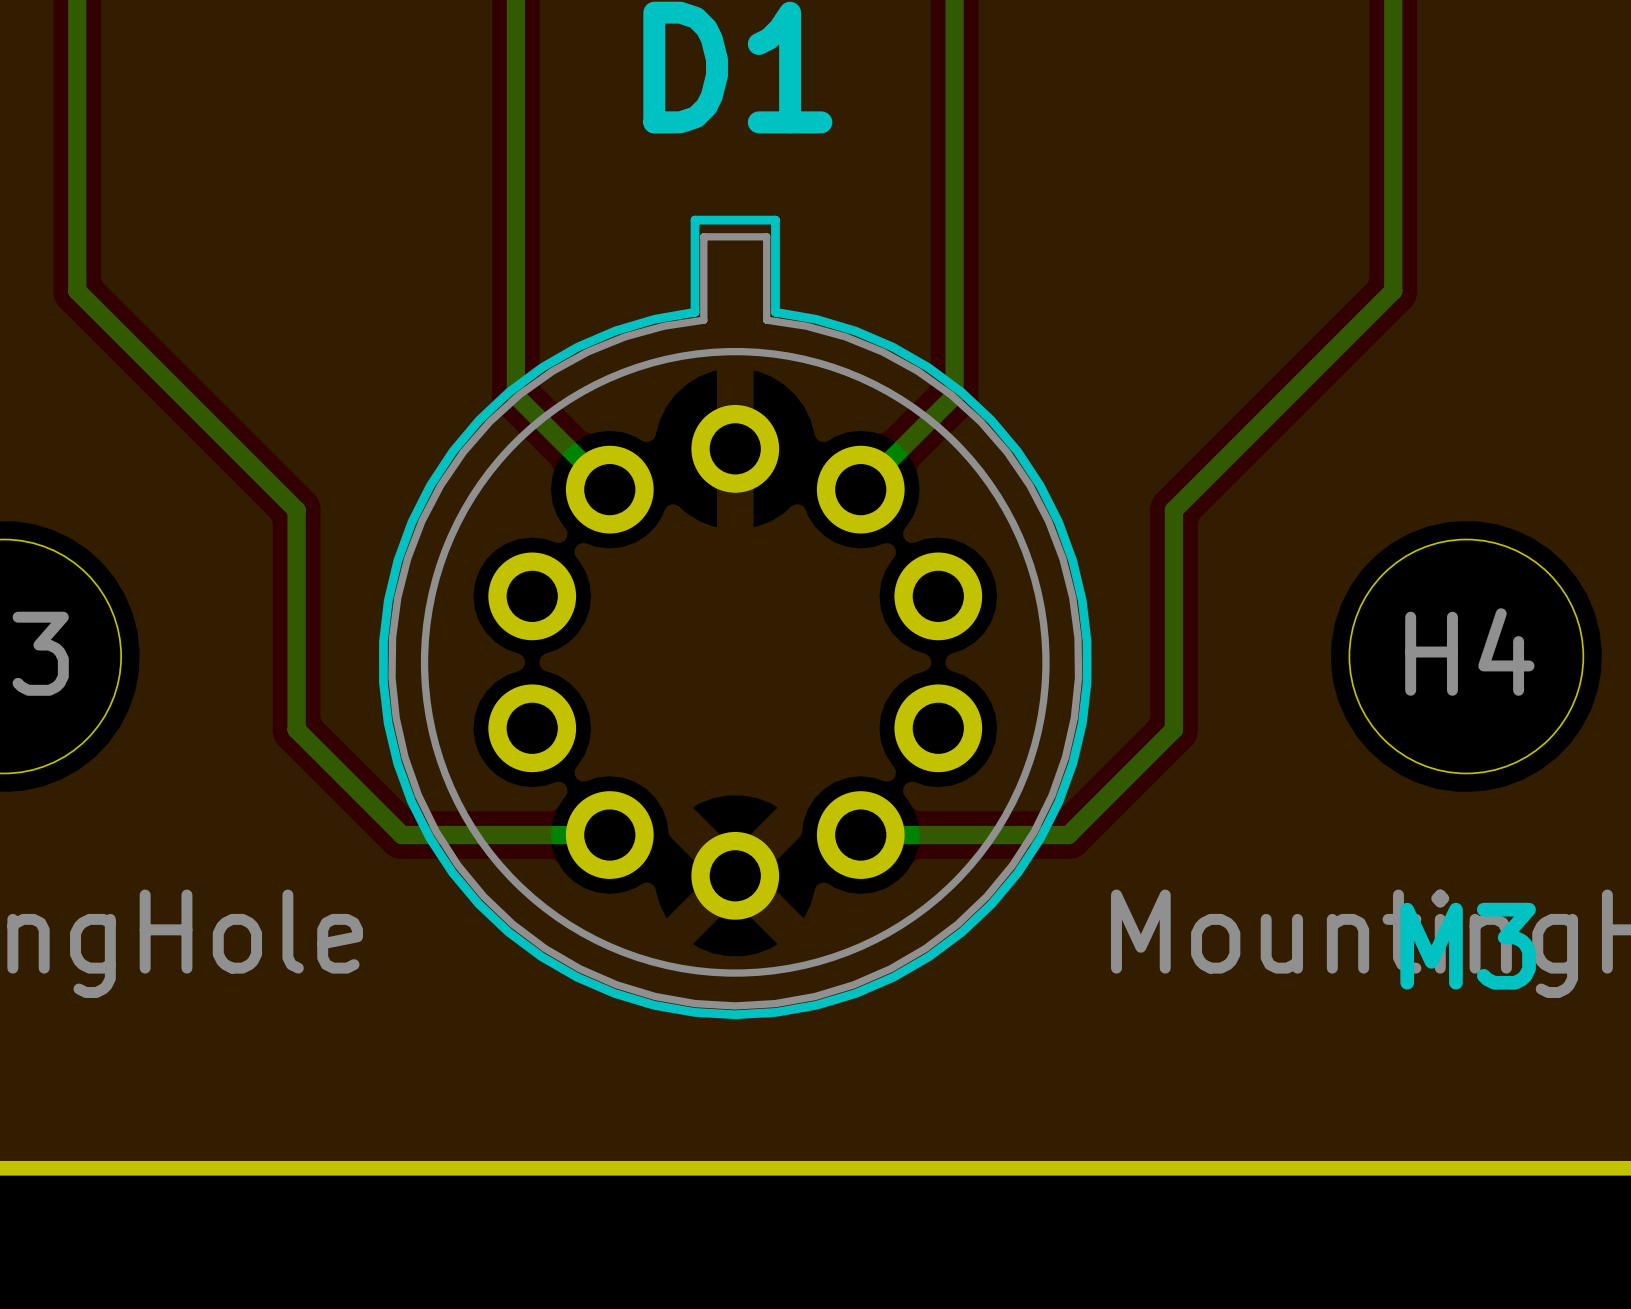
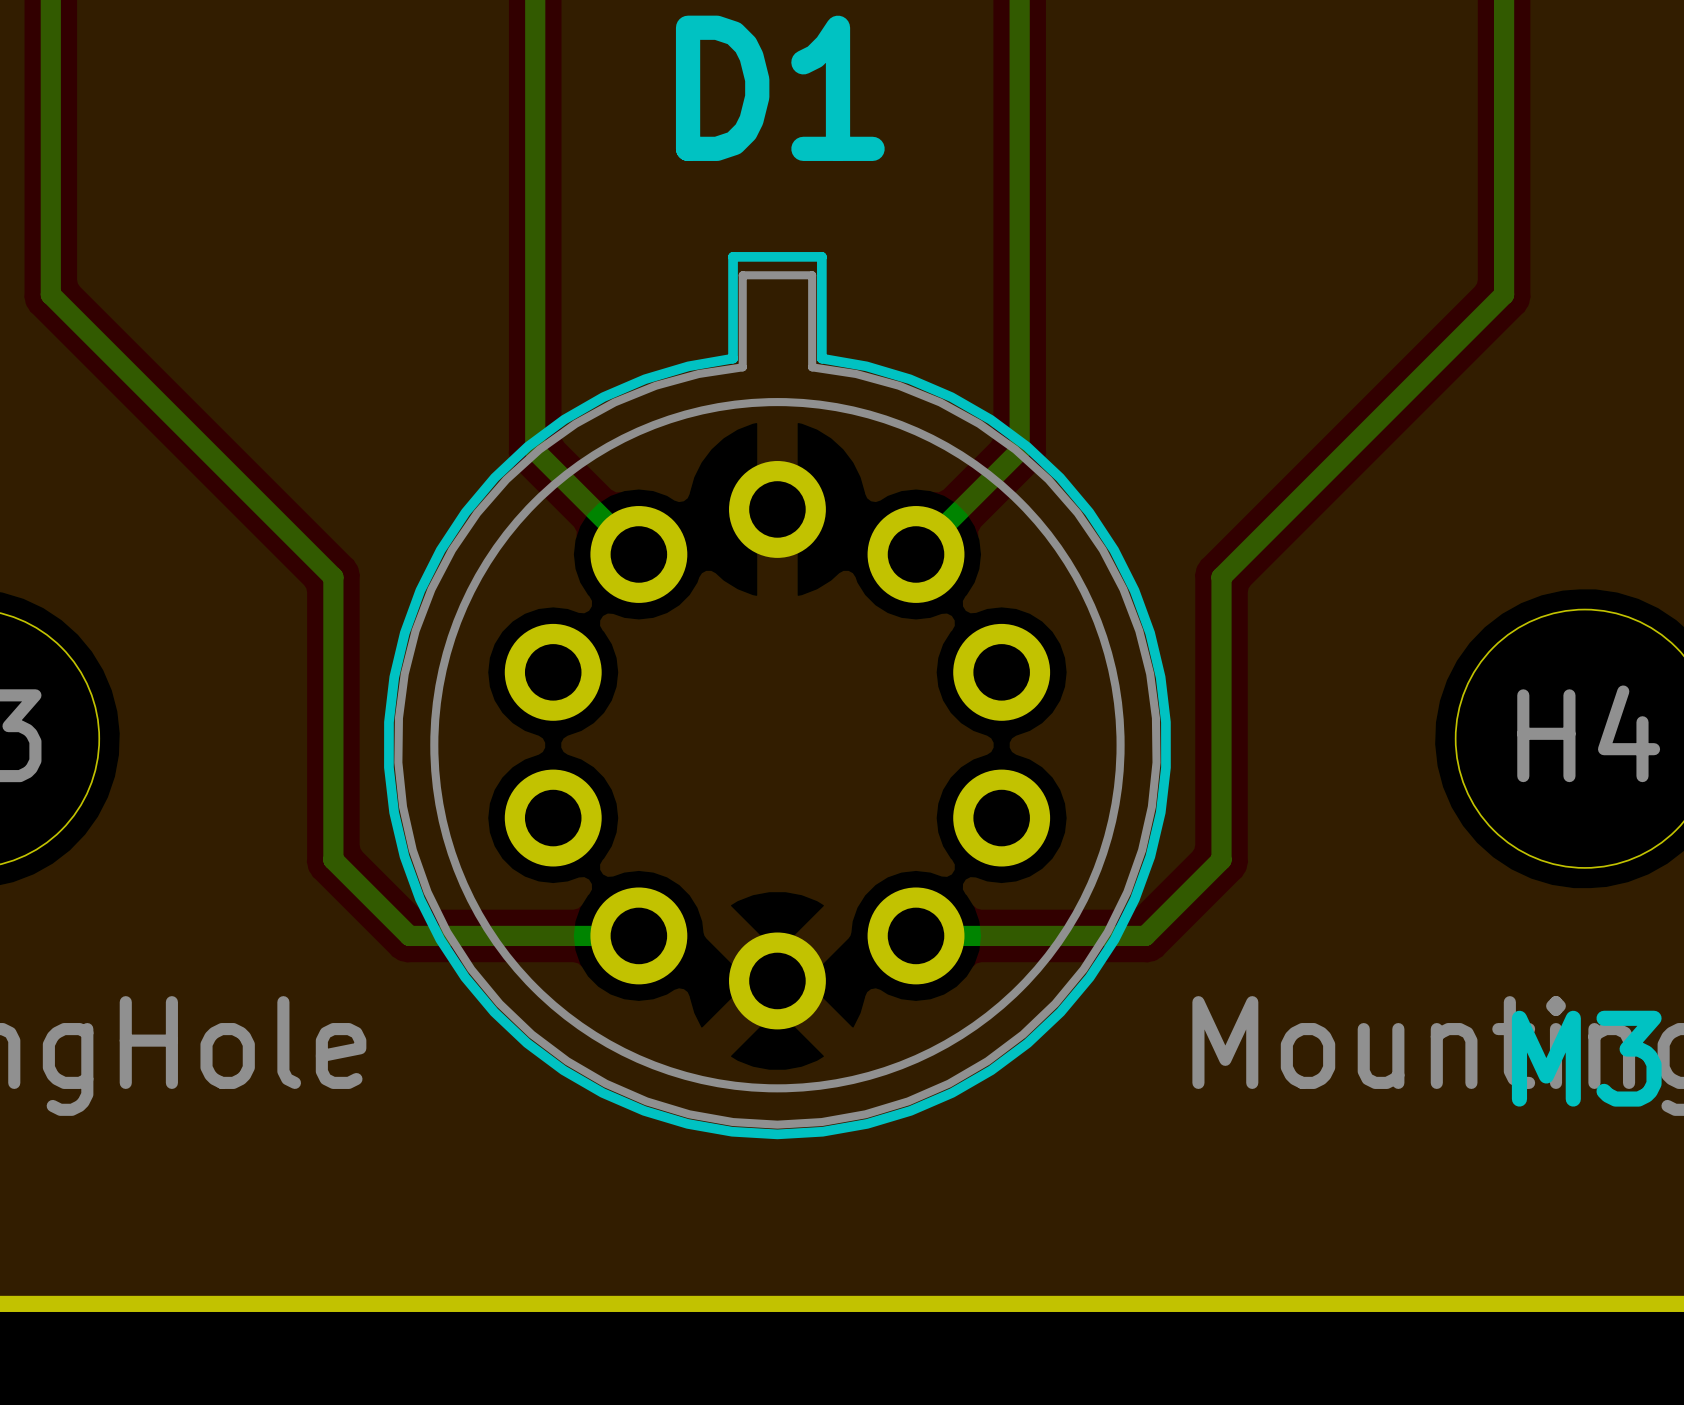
bottom track: (77, 254) (77, 290) (296, 510) (296, 729) (333, 766) -> (50, 294) (333, 577) (333, 859)
bottom track: (1393, 254) (1393, 290) (1173, 510) (1173, 729) (1137, 766) -> (1504, 294) (1221, 577) (1221, 859)

